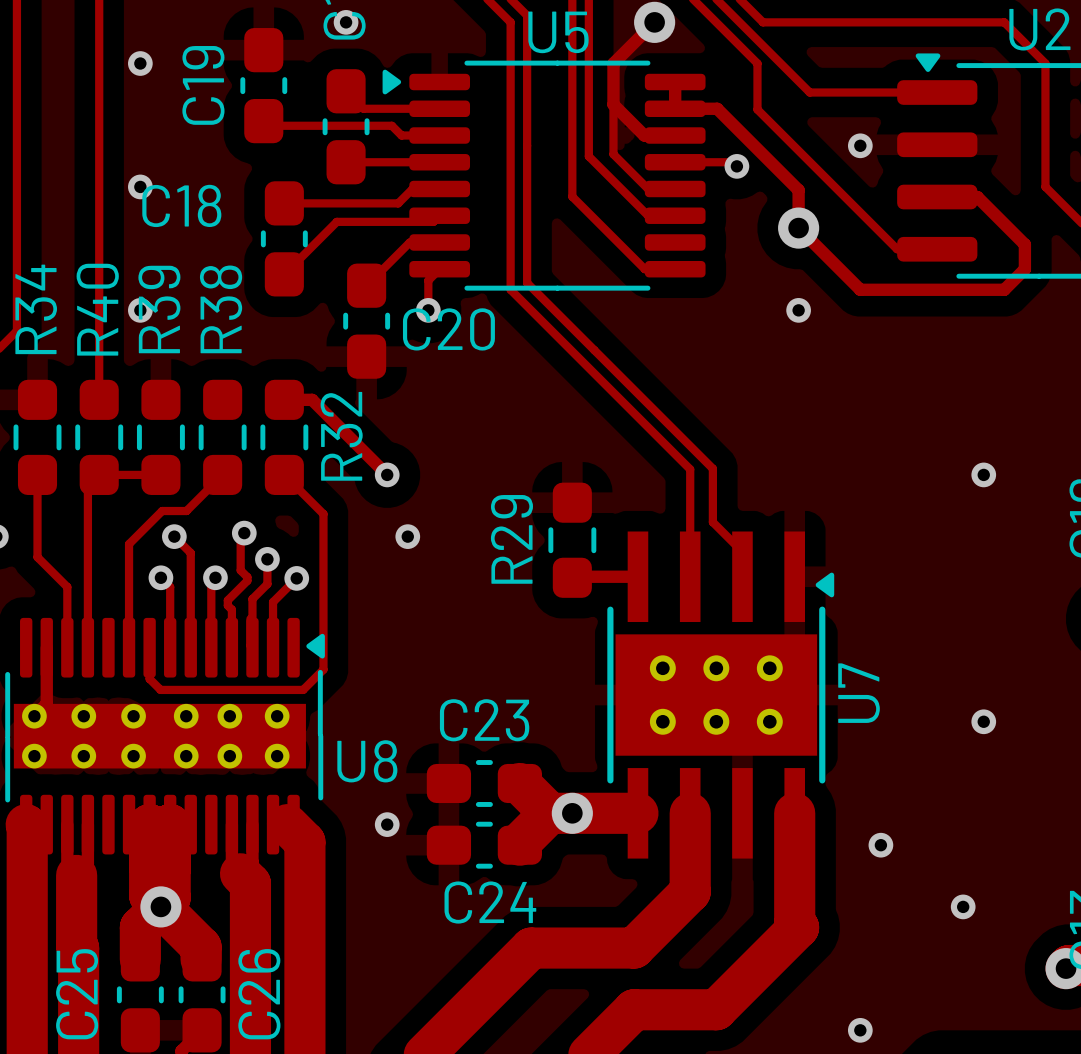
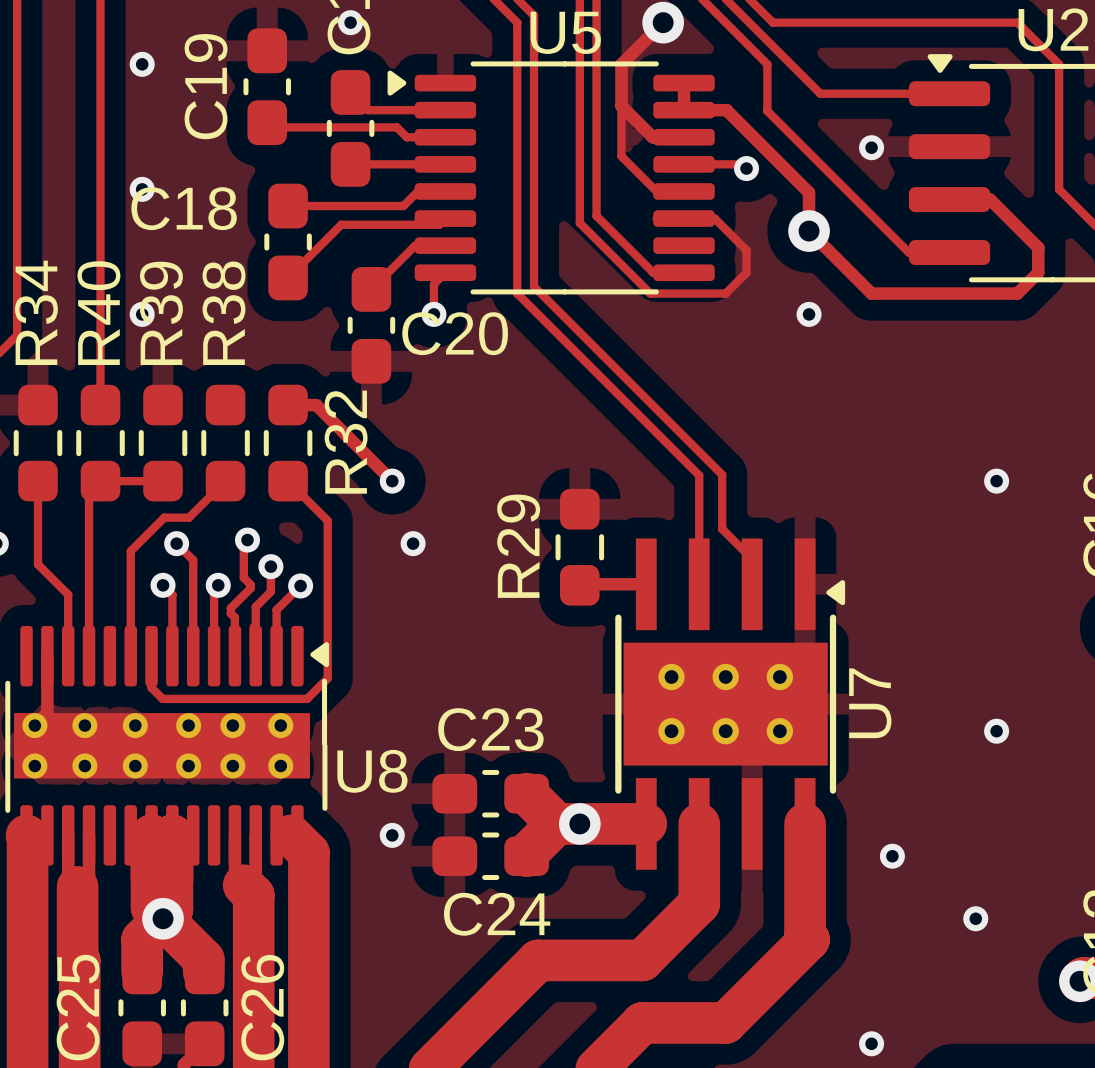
track: (588, 156) (648, 215) -> none
track: (572, 196) (588, 213) -> (596, 158) (596, 215)
track: none -> (579, 199) (579, 223) (650, 293) (725, 293) (746, 272) (746, 250) (714, 218) (684, 218)

